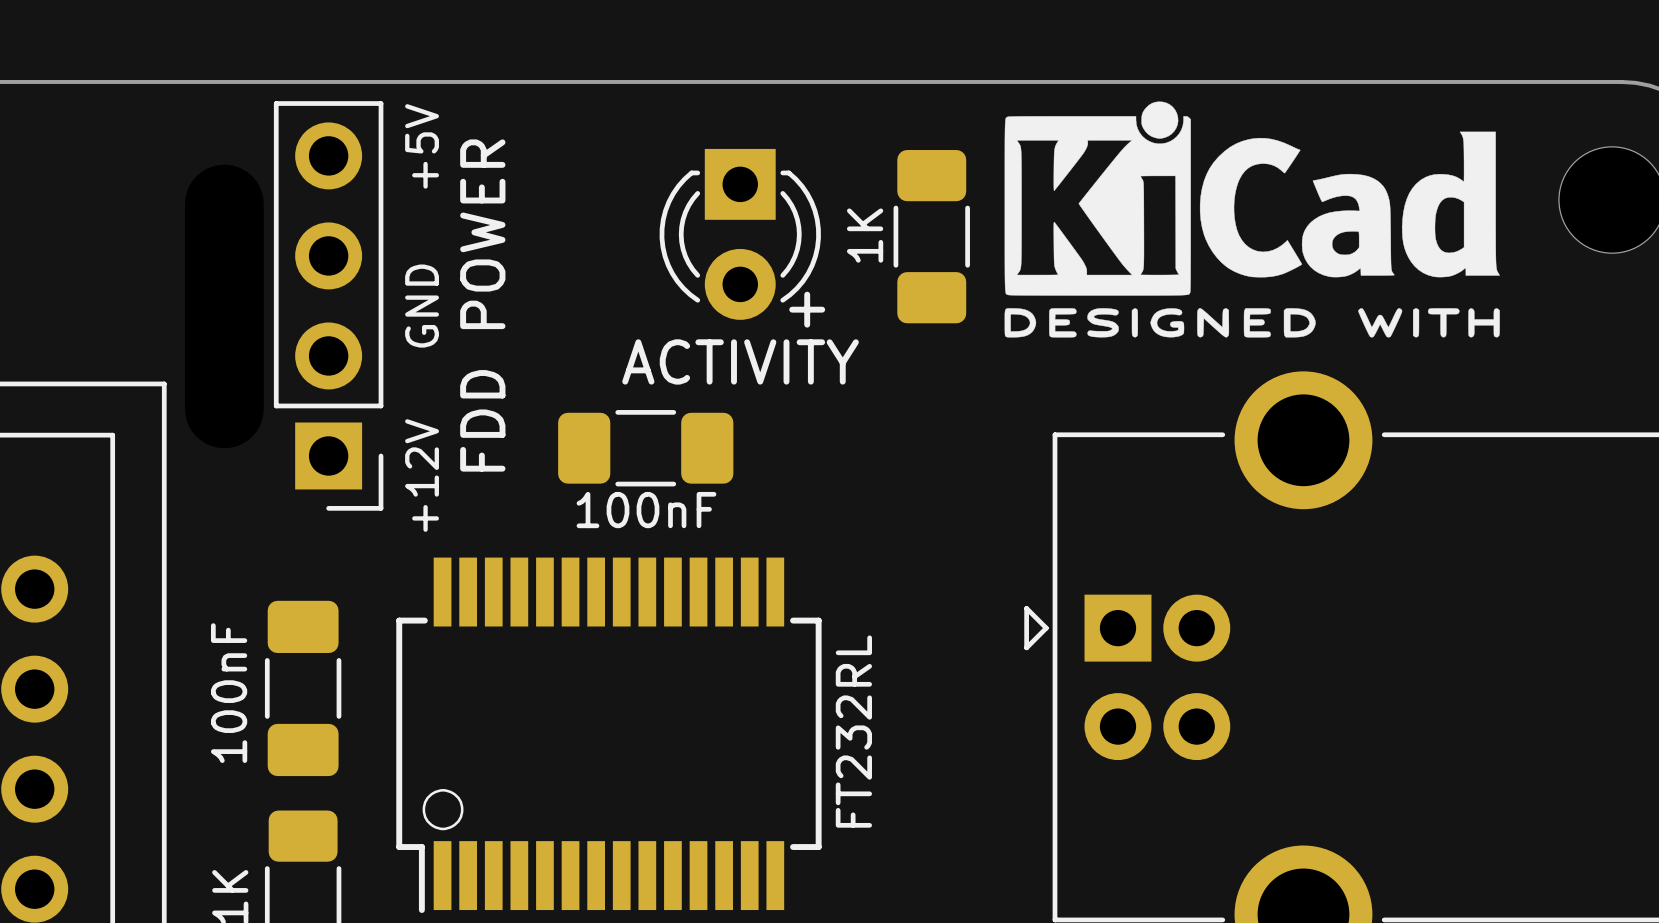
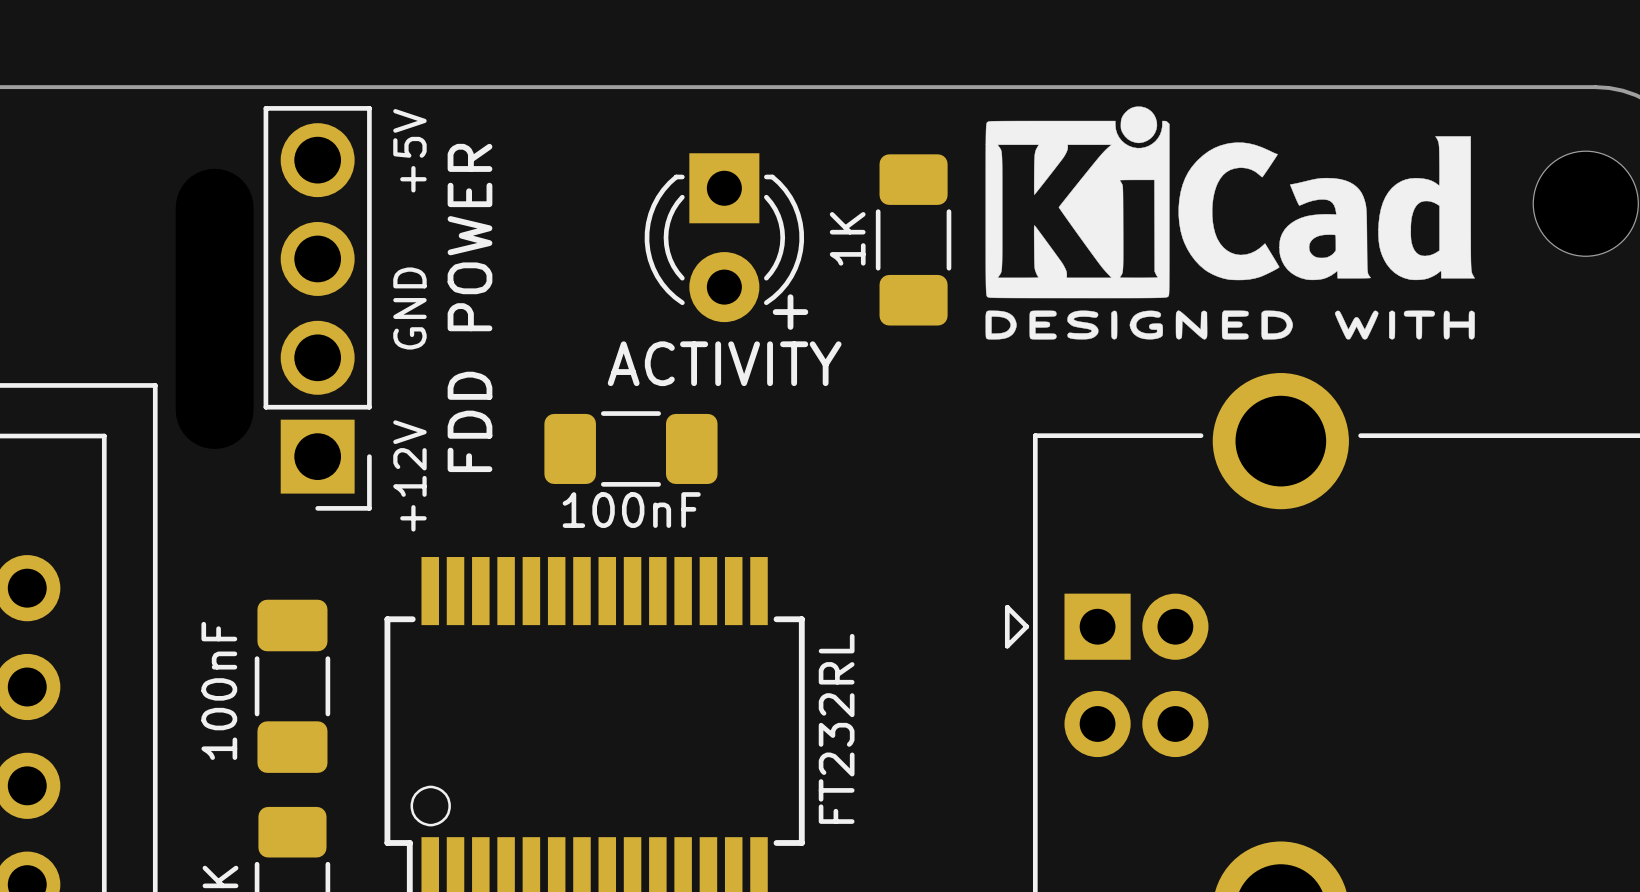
part footprint: [273, 101, 384, 511] -> [263, 106, 372, 511]

